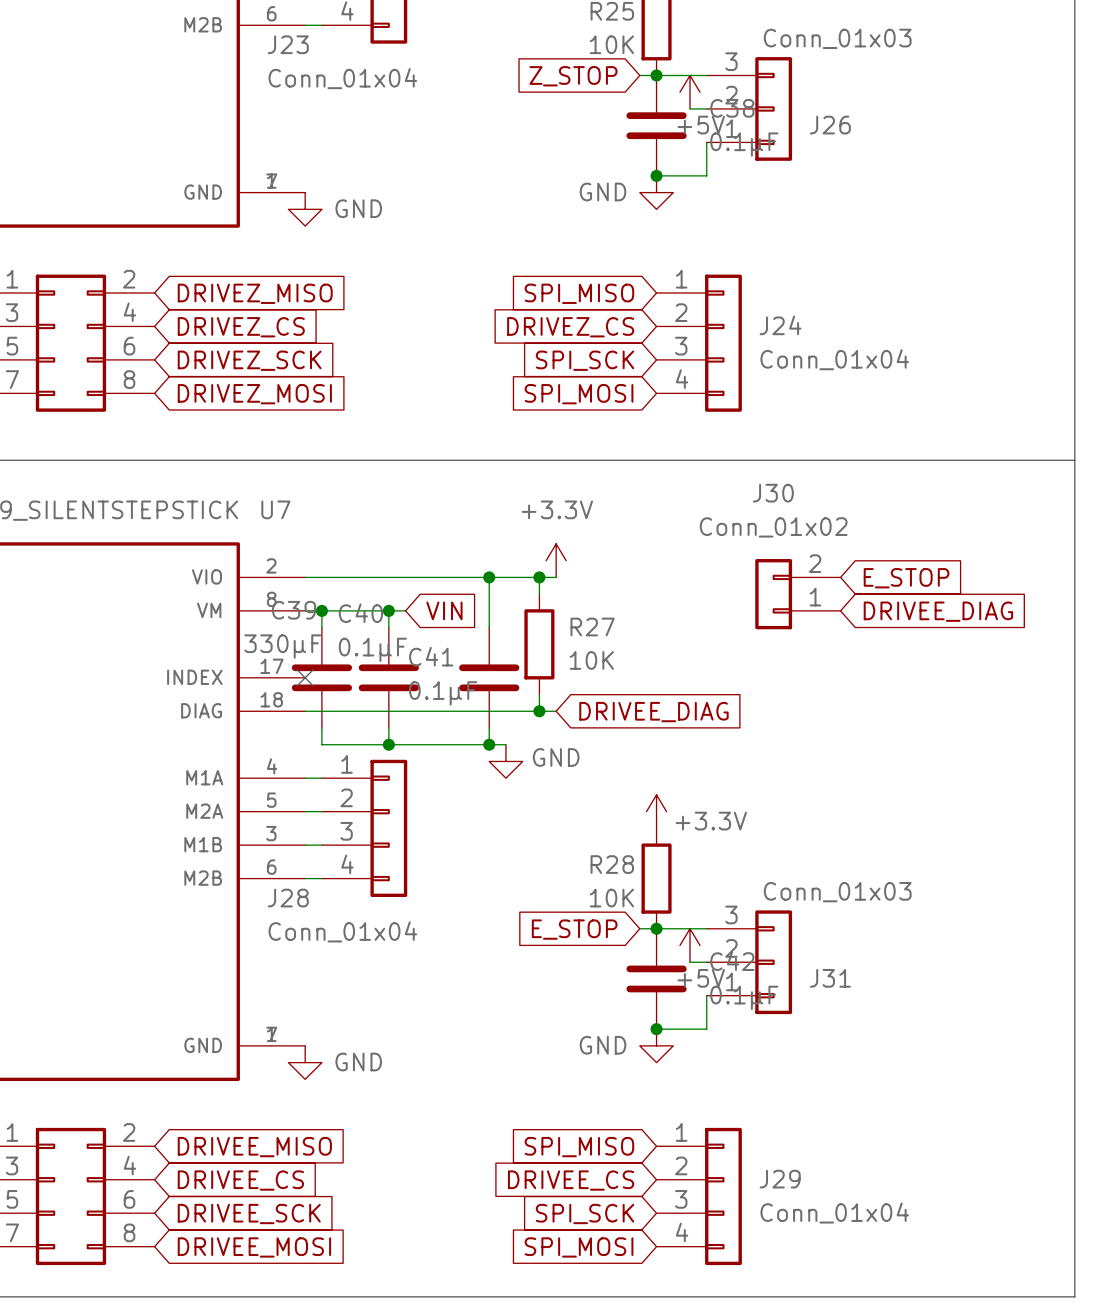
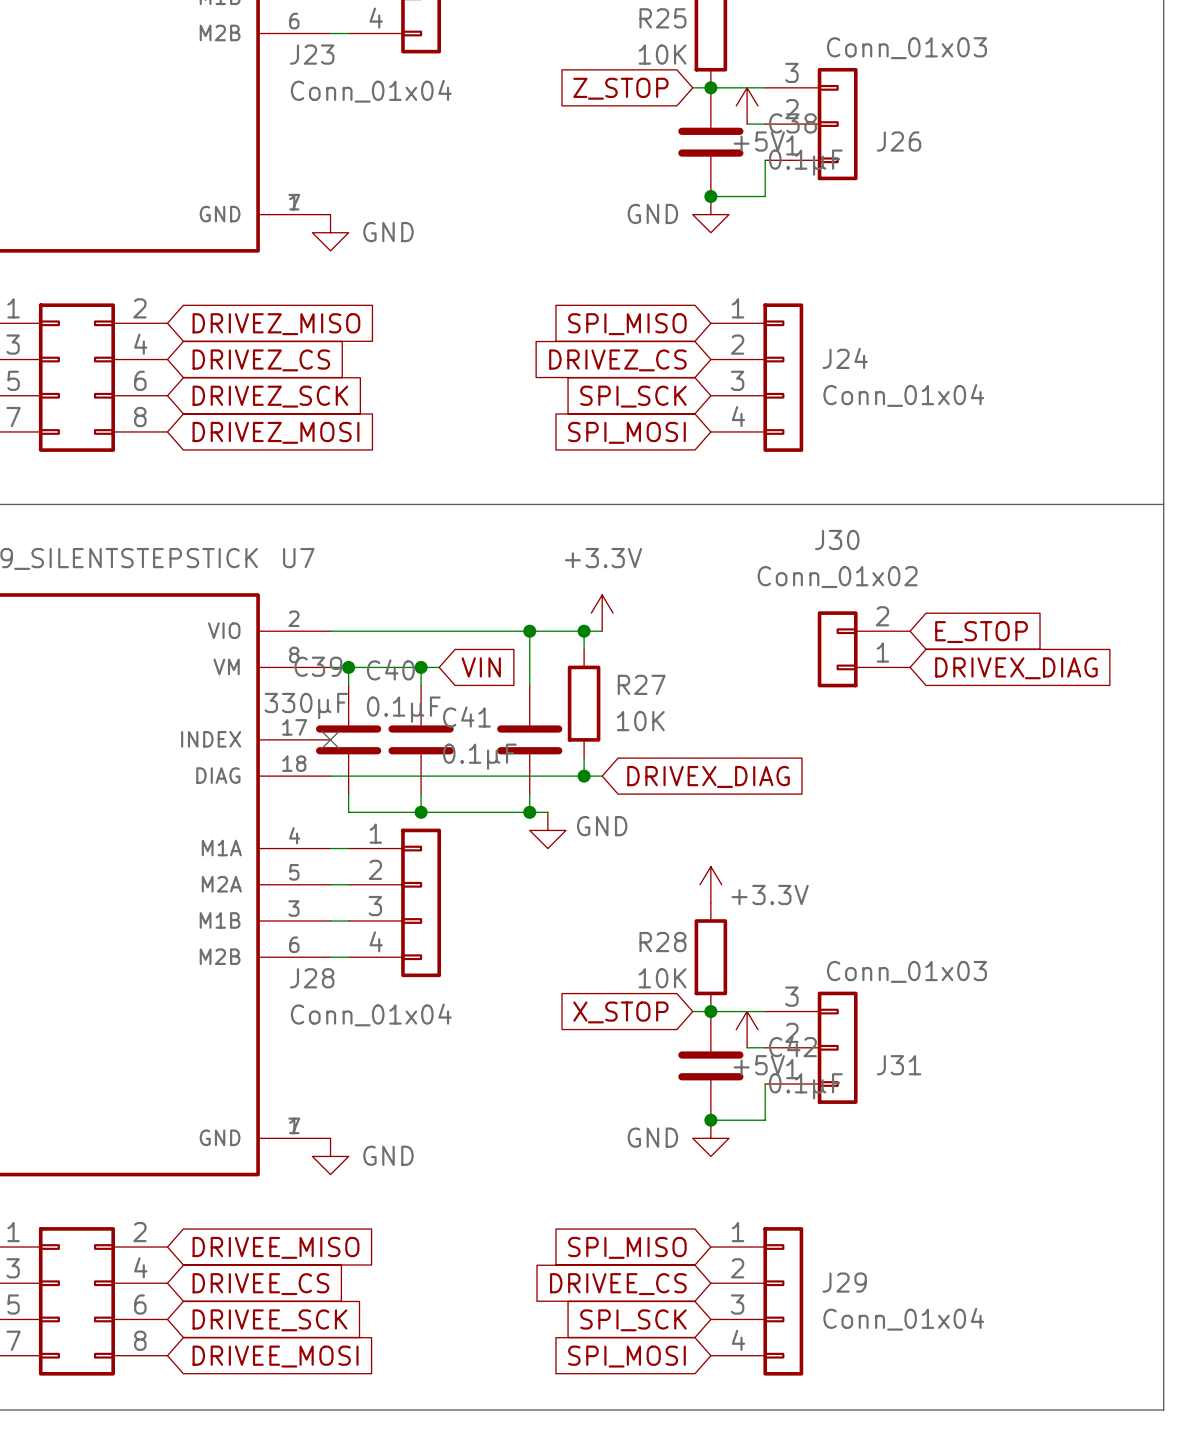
global label: DRIVEE_DIAG (938, 611) -> DRIVEX_DIAG (1016, 668)
global label: DRIVEE_DIAG (653, 712) -> DRIVEX_DIAG (708, 776)
global label: E_STOP (574, 929) -> X_STOP (620, 1012)

